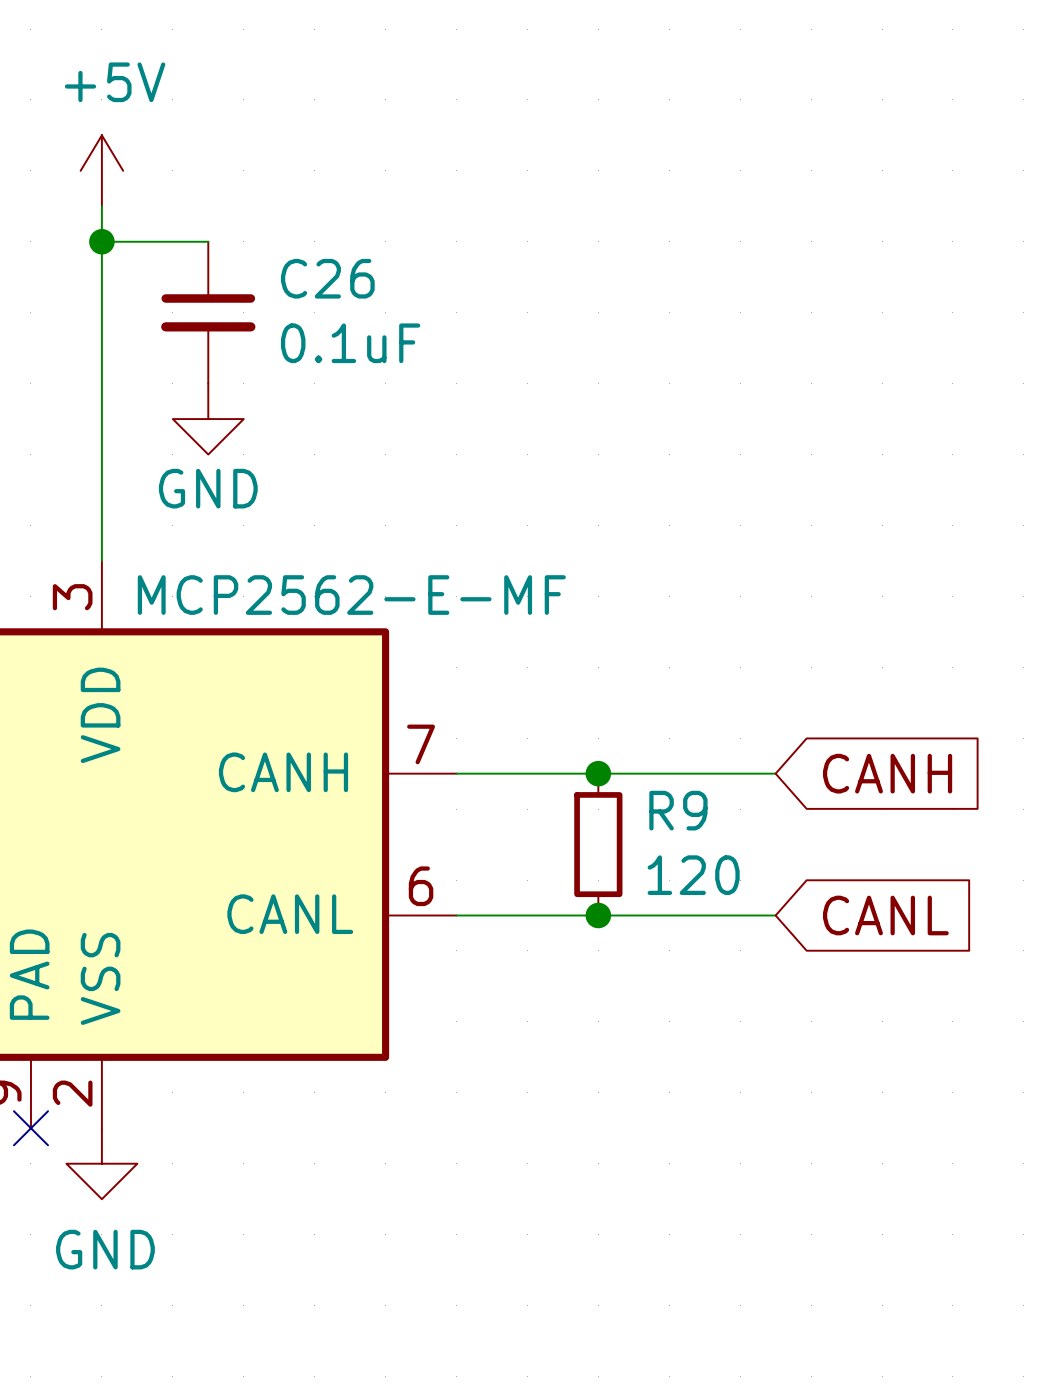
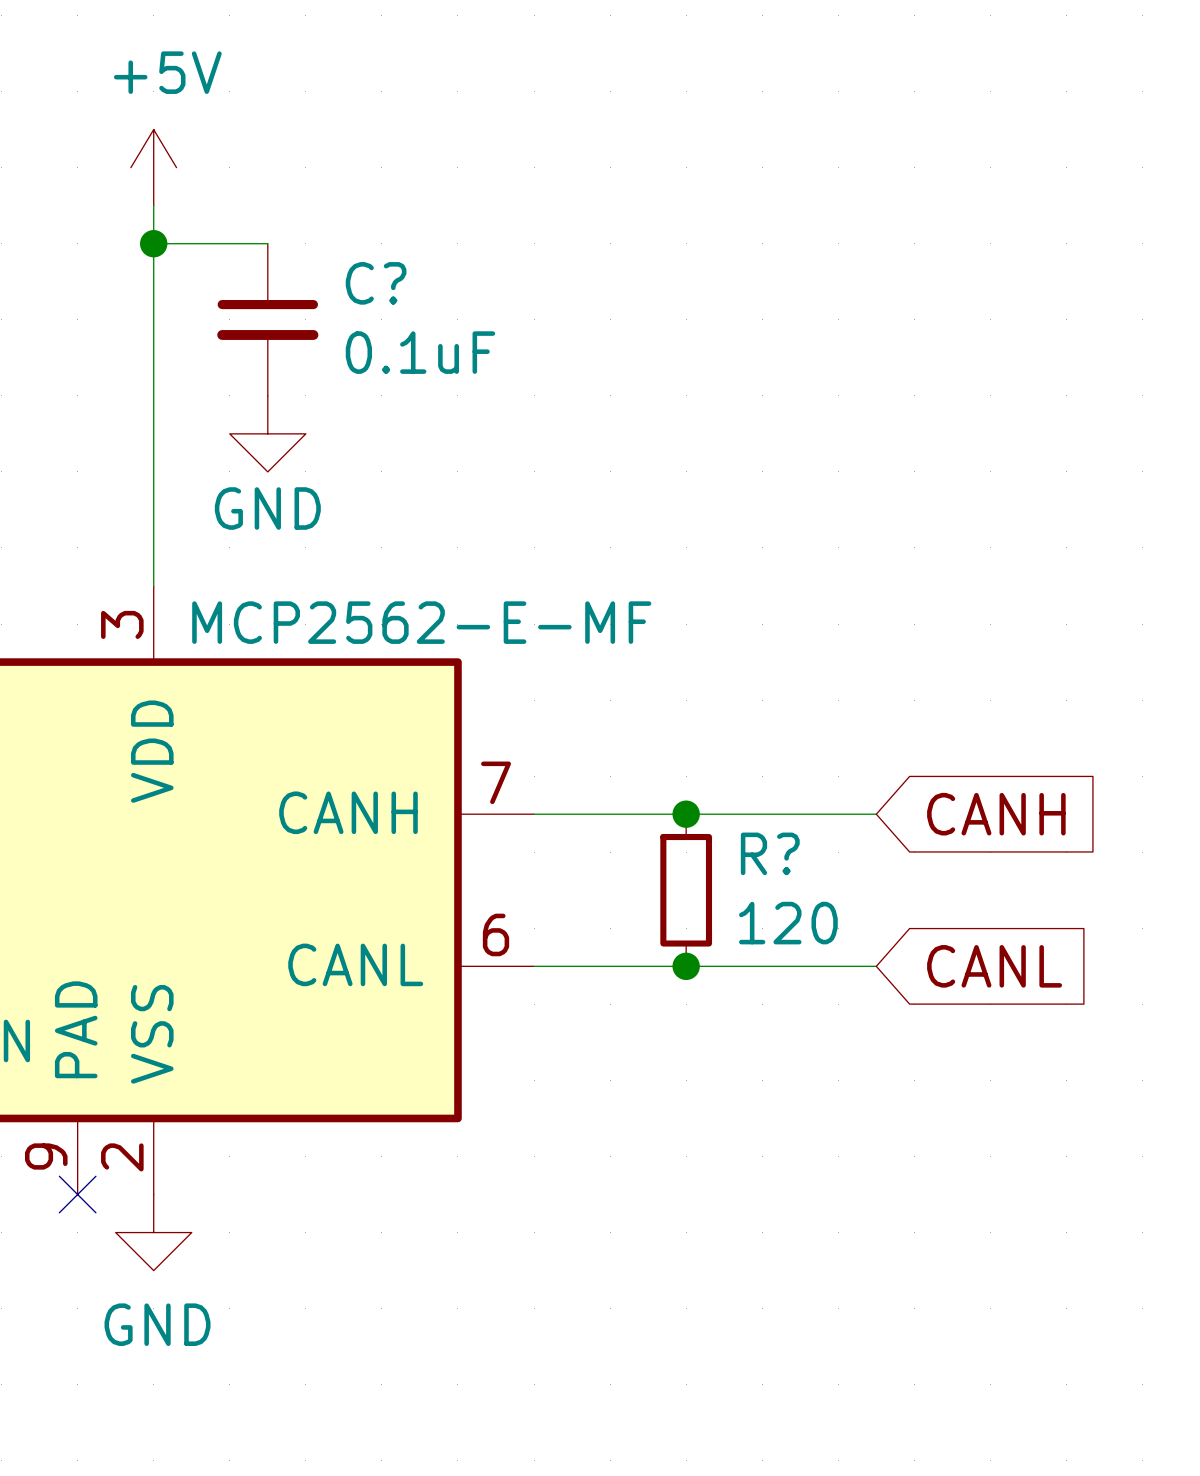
C26 name: C26 (327, 278) -> C? (376, 283)
R9 name: R9 (678, 810) -> R? (770, 853)

